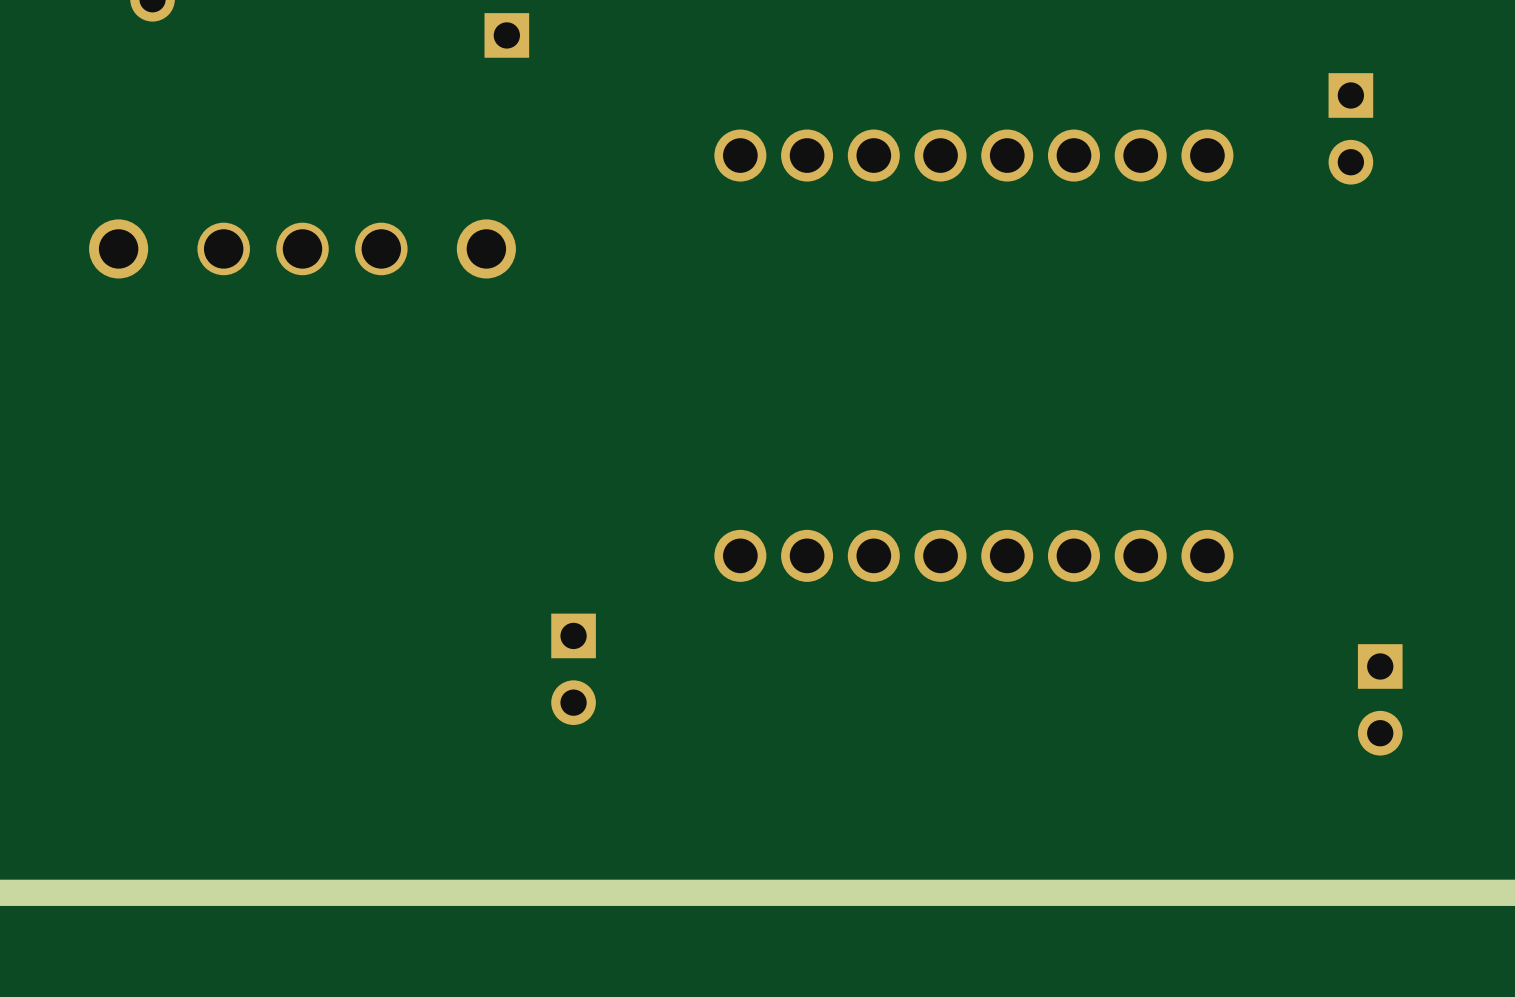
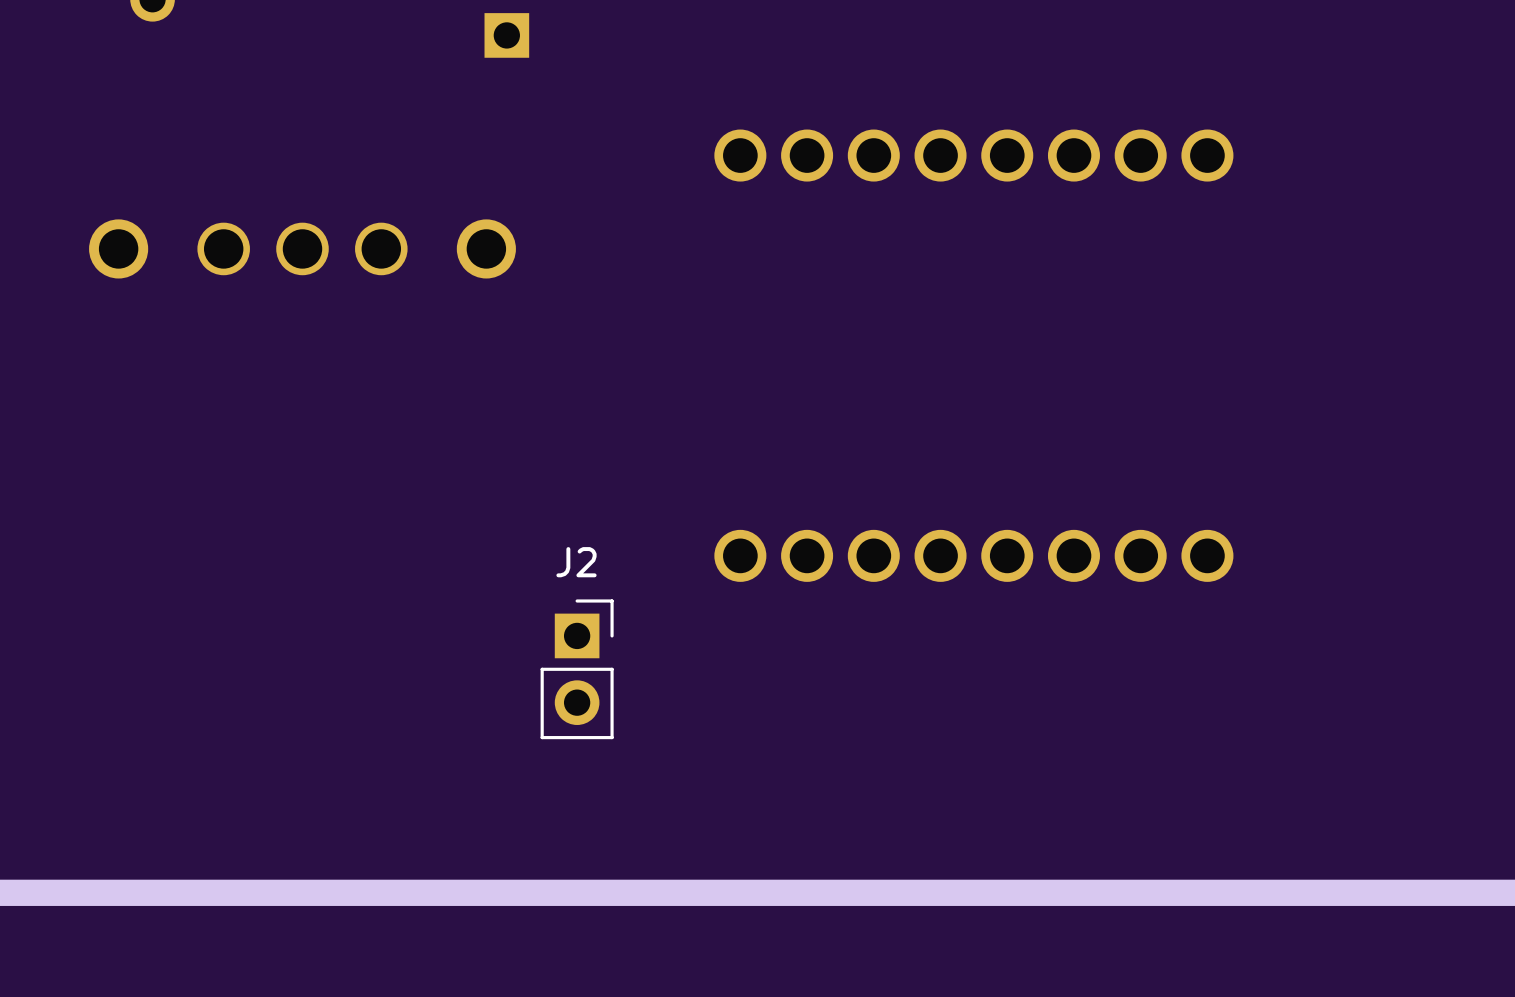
part: (1350, 128) -> none
J2 side: bottom (573, 669) -> top (577, 669)
part: (1380, 699) -> none

